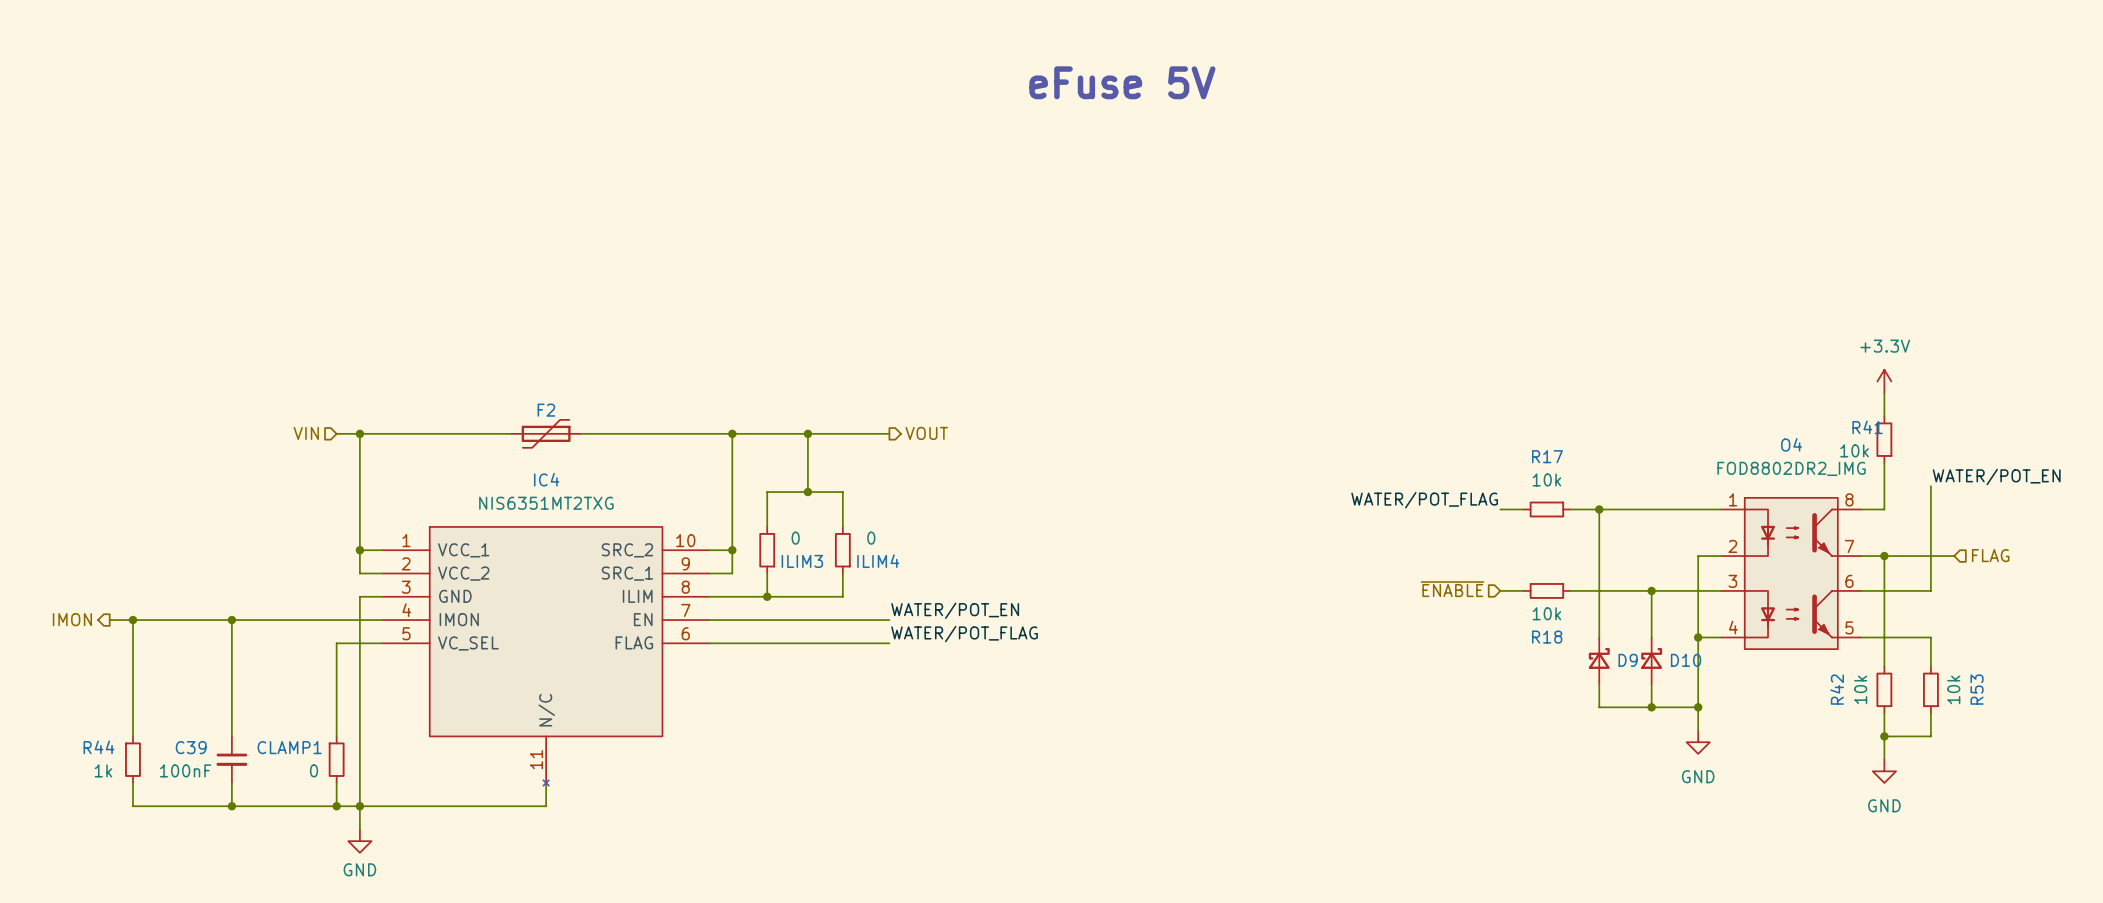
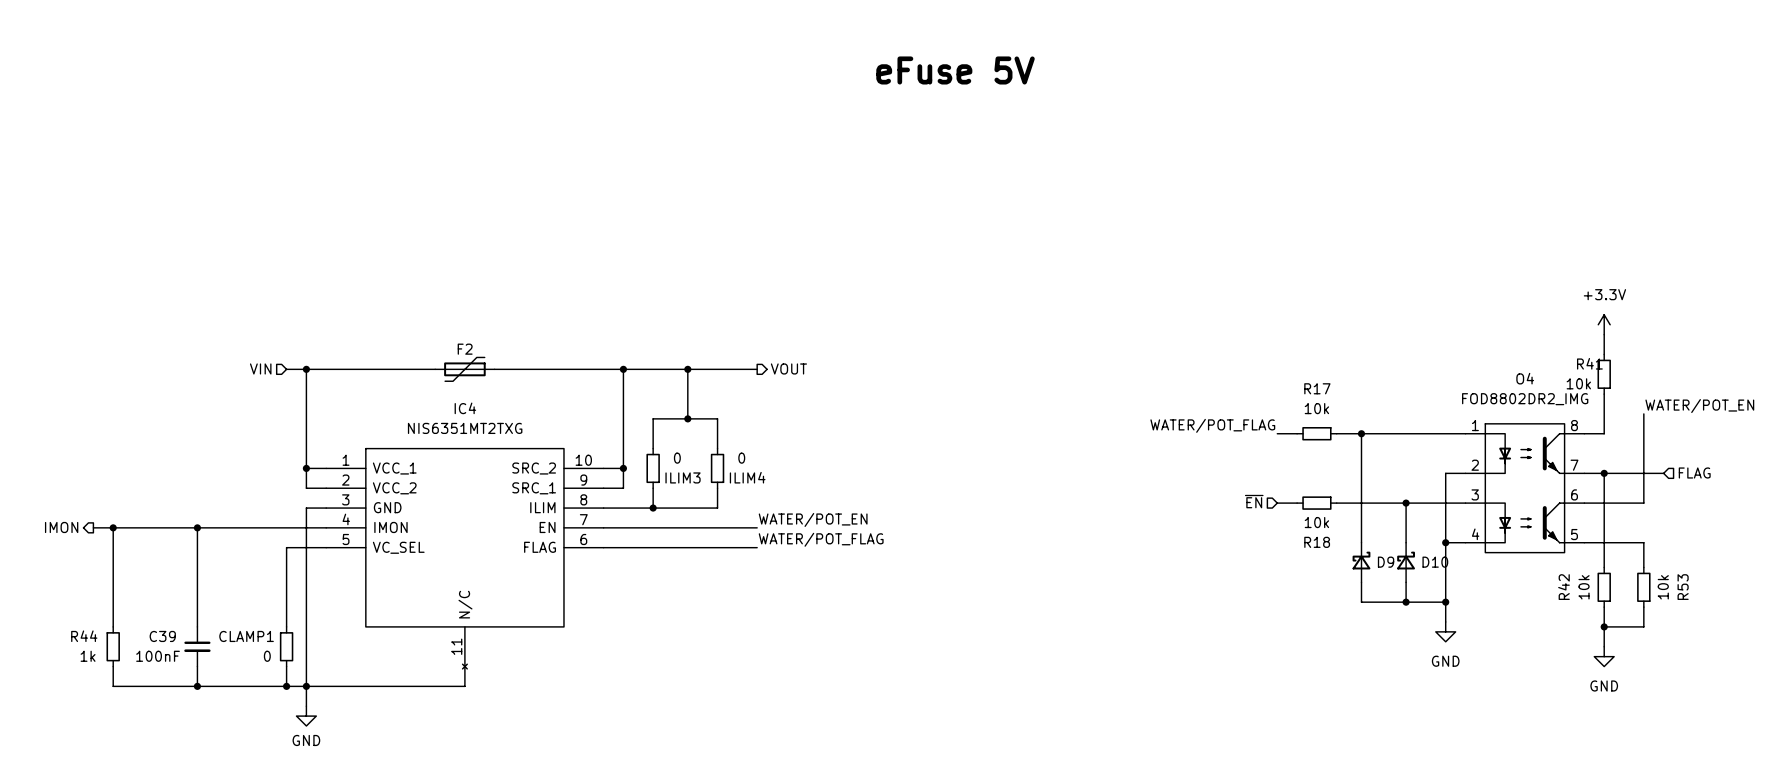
hierarchical label: ~{ENABLE} (1452, 589) -> ~{EN} (1254, 501)

